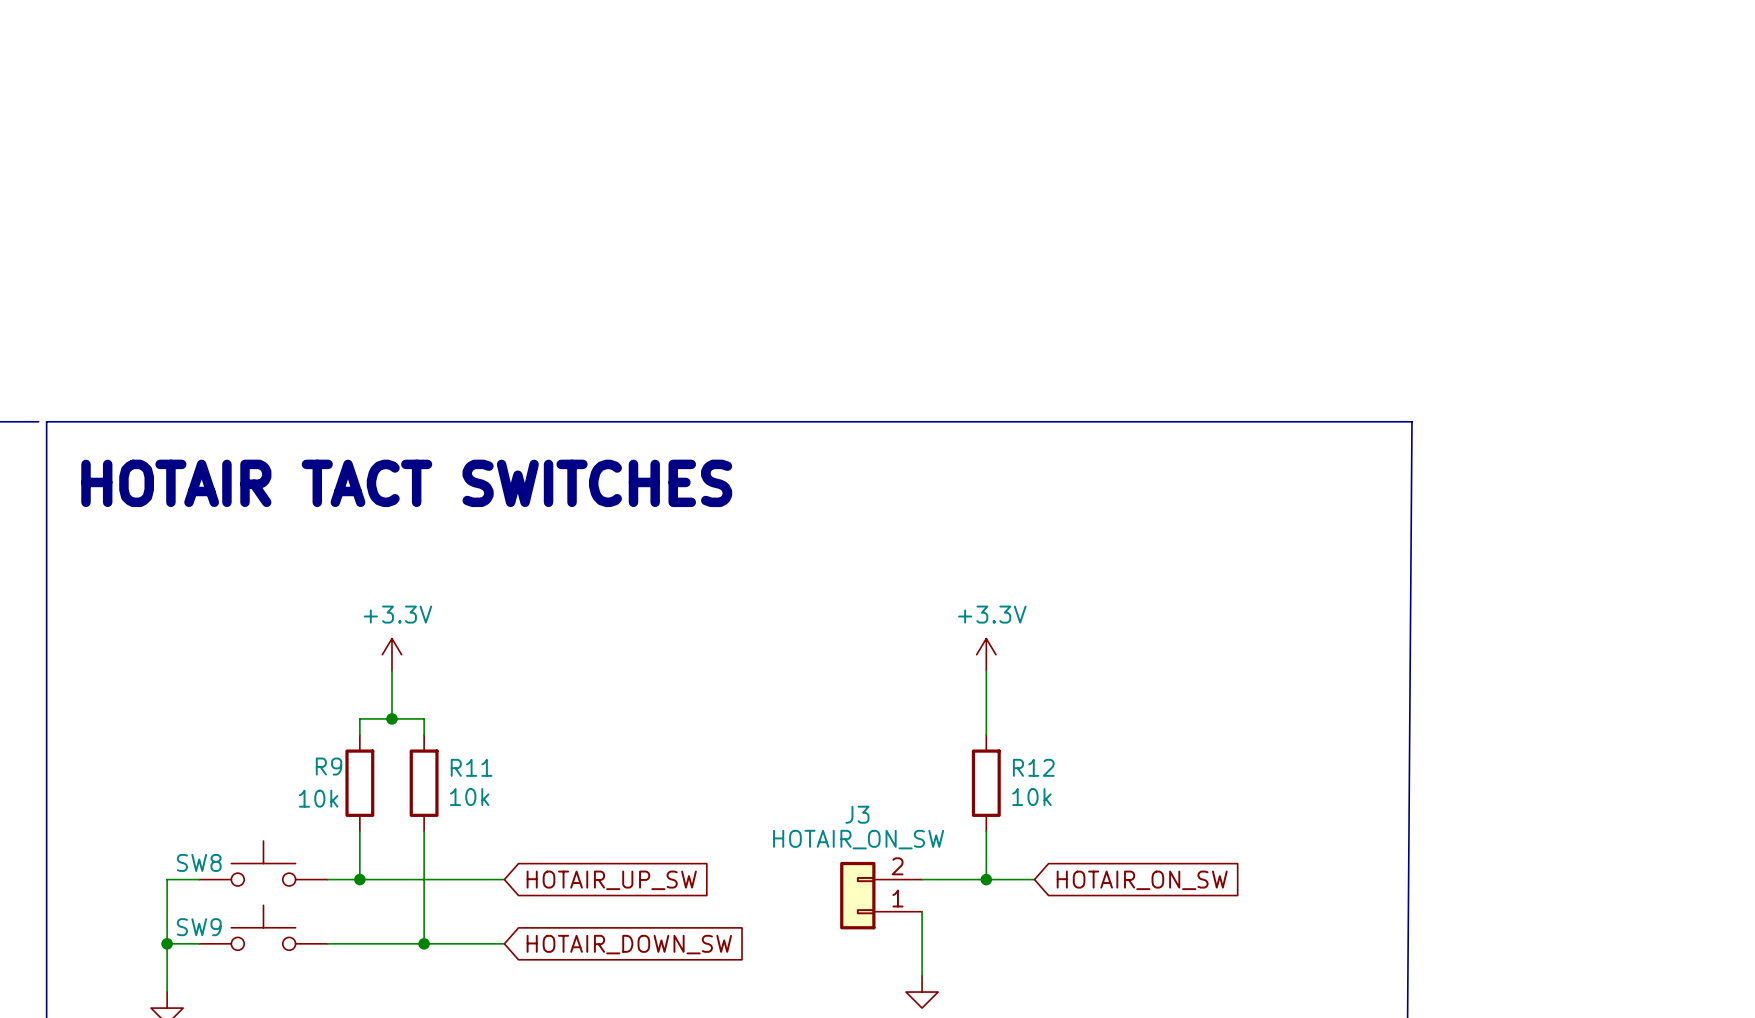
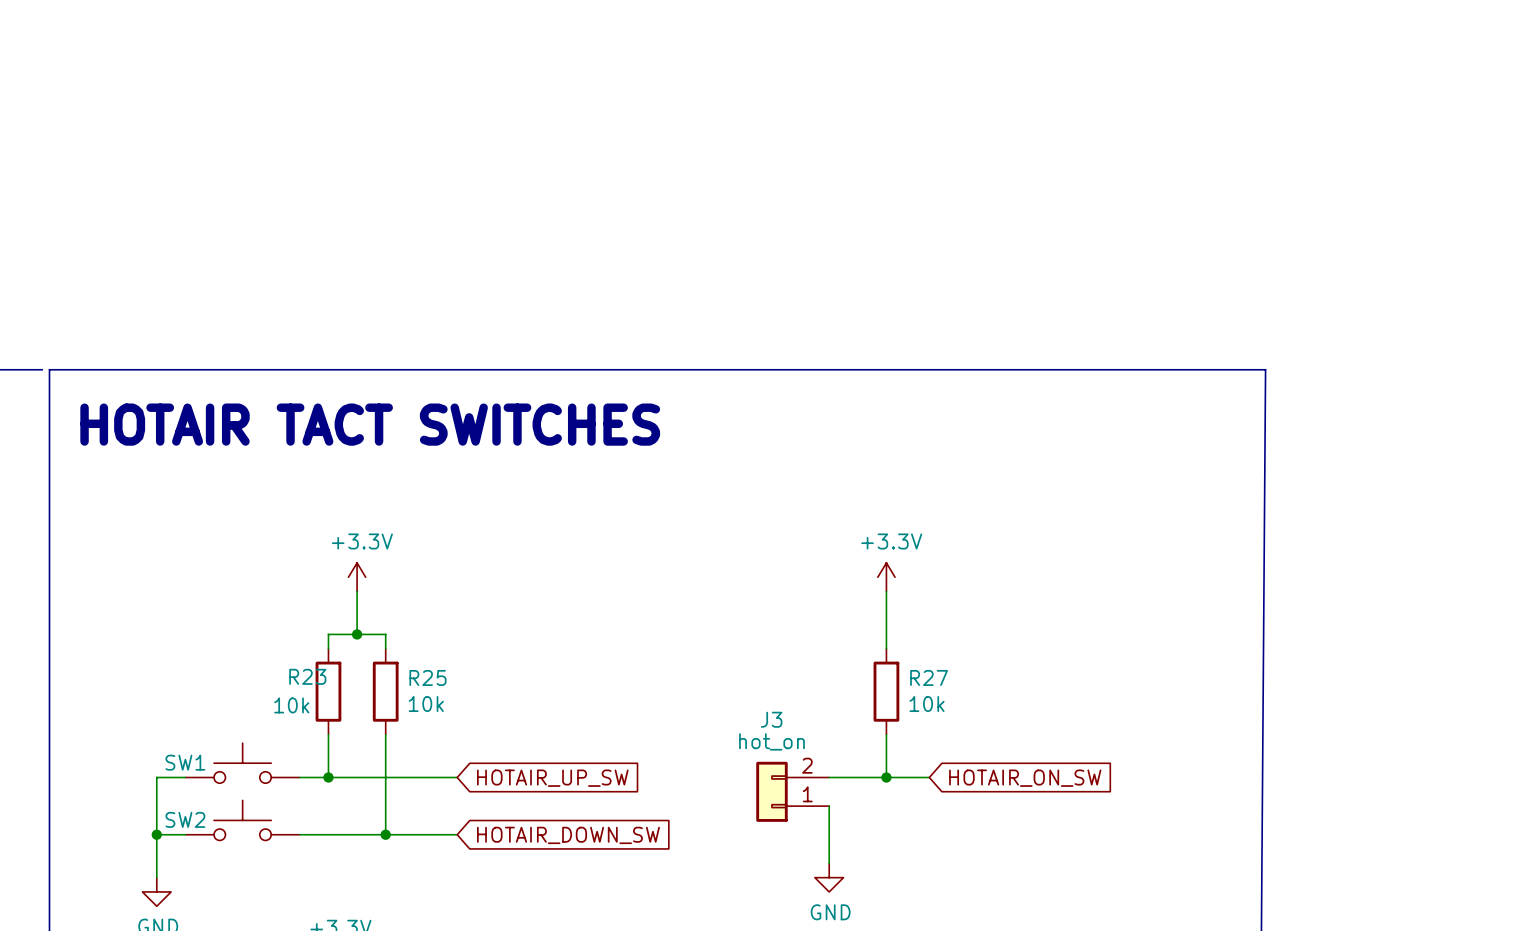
R9 name: R9 (329, 766) -> R23 (307, 676)
R11 name: R11 (471, 767) -> R25 (427, 677)
R12 name: R12 (1033, 767) -> R27 (929, 677)
J3 value: HOTAIR_ON_SW (858, 839) -> hot_on (771, 741)
SW8 name: SW8 (199, 862) -> SW1 (185, 762)
SW9 name: SW9 (199, 927) -> SW2 (185, 819)

